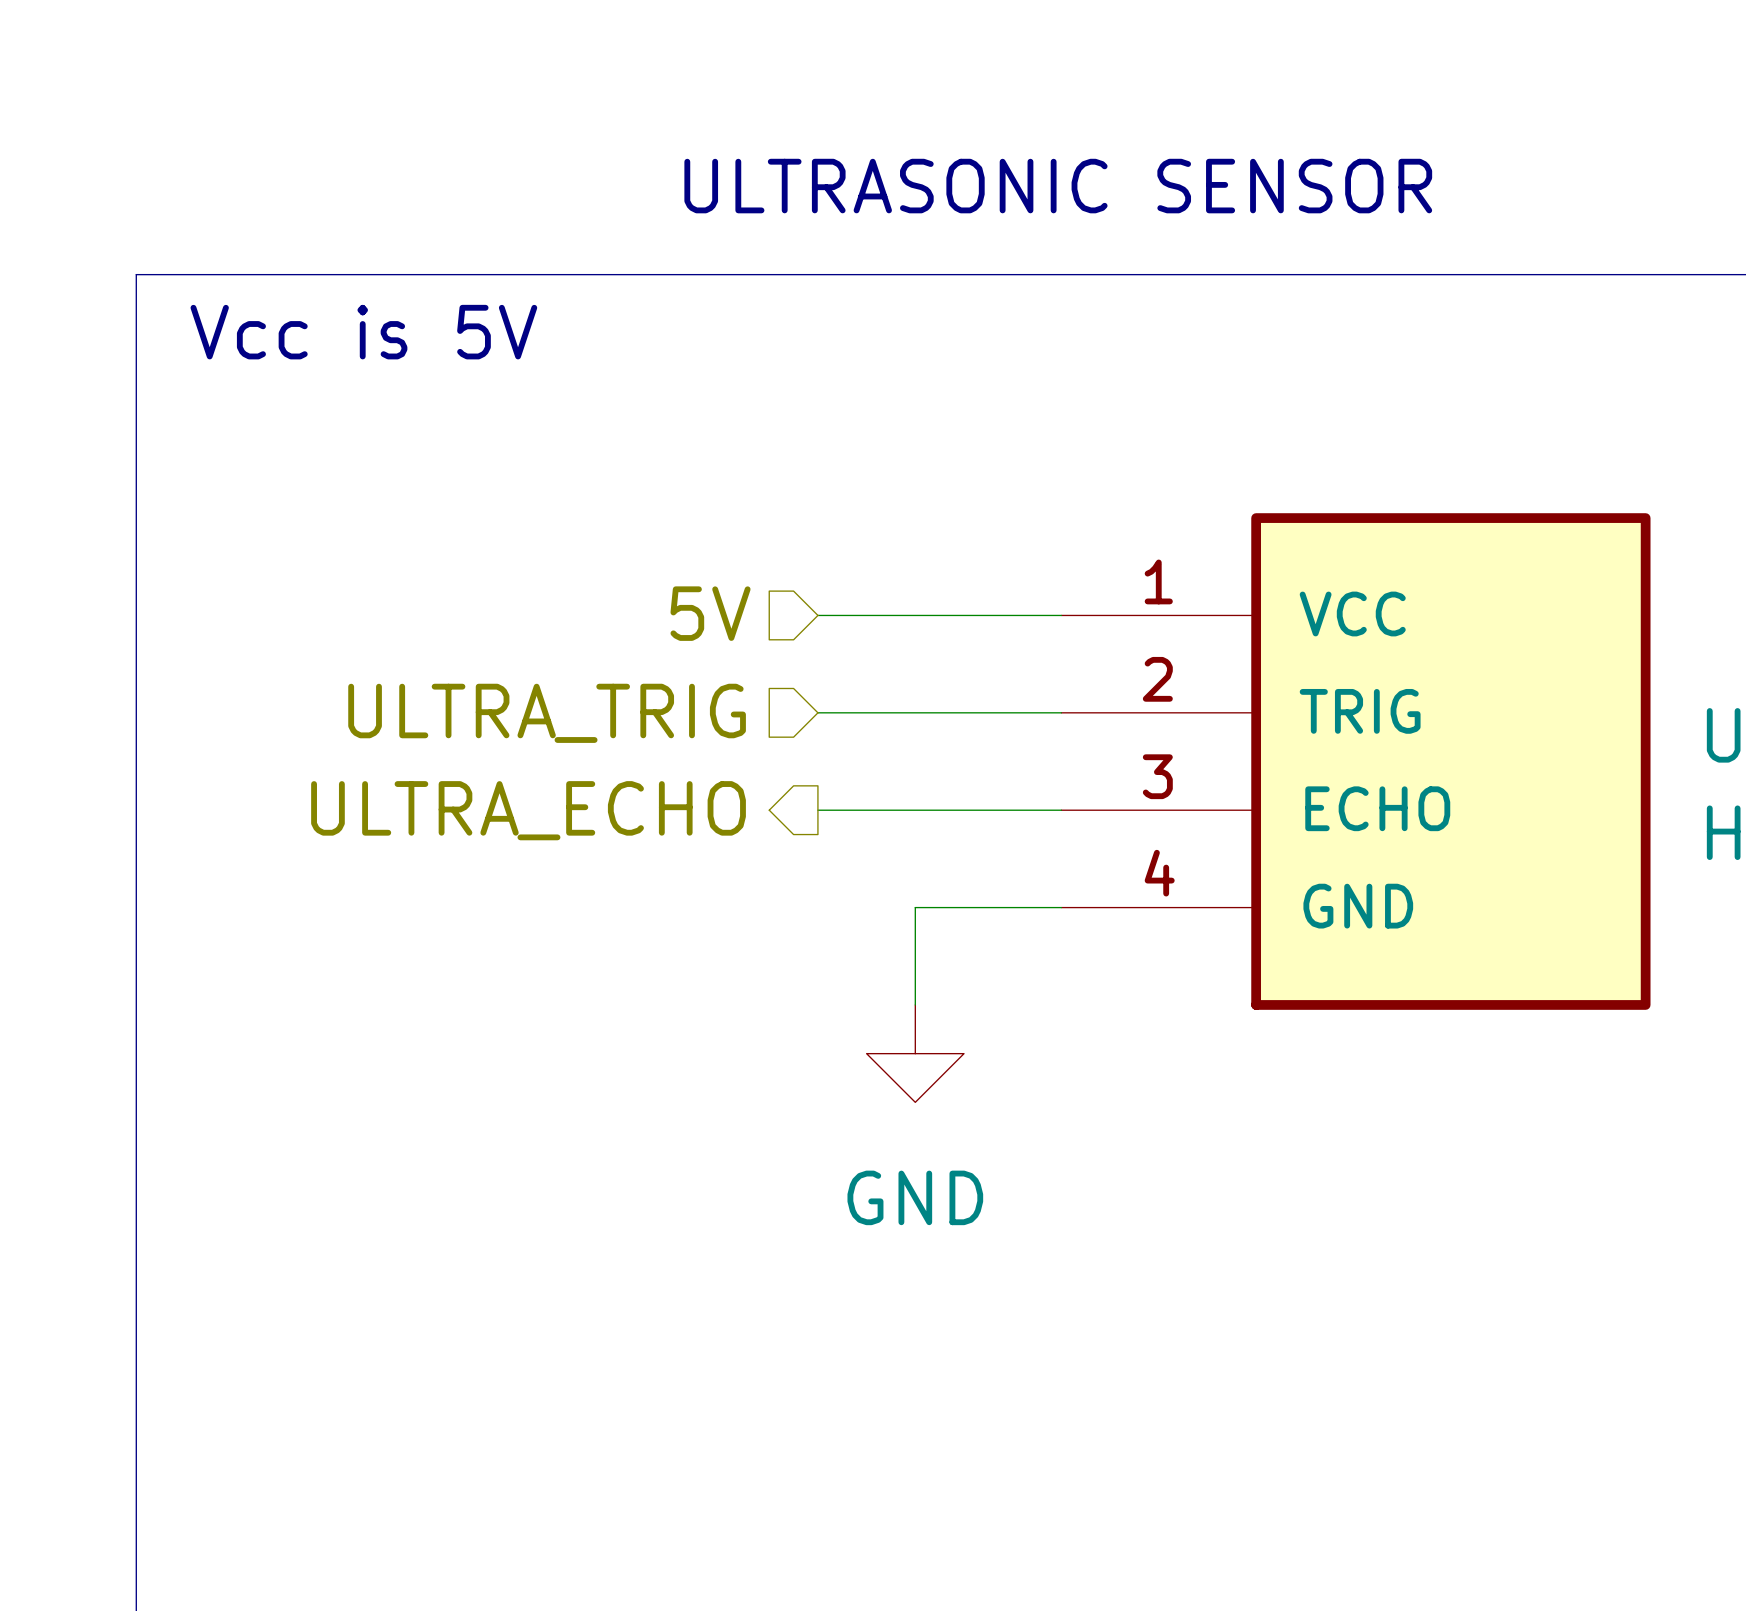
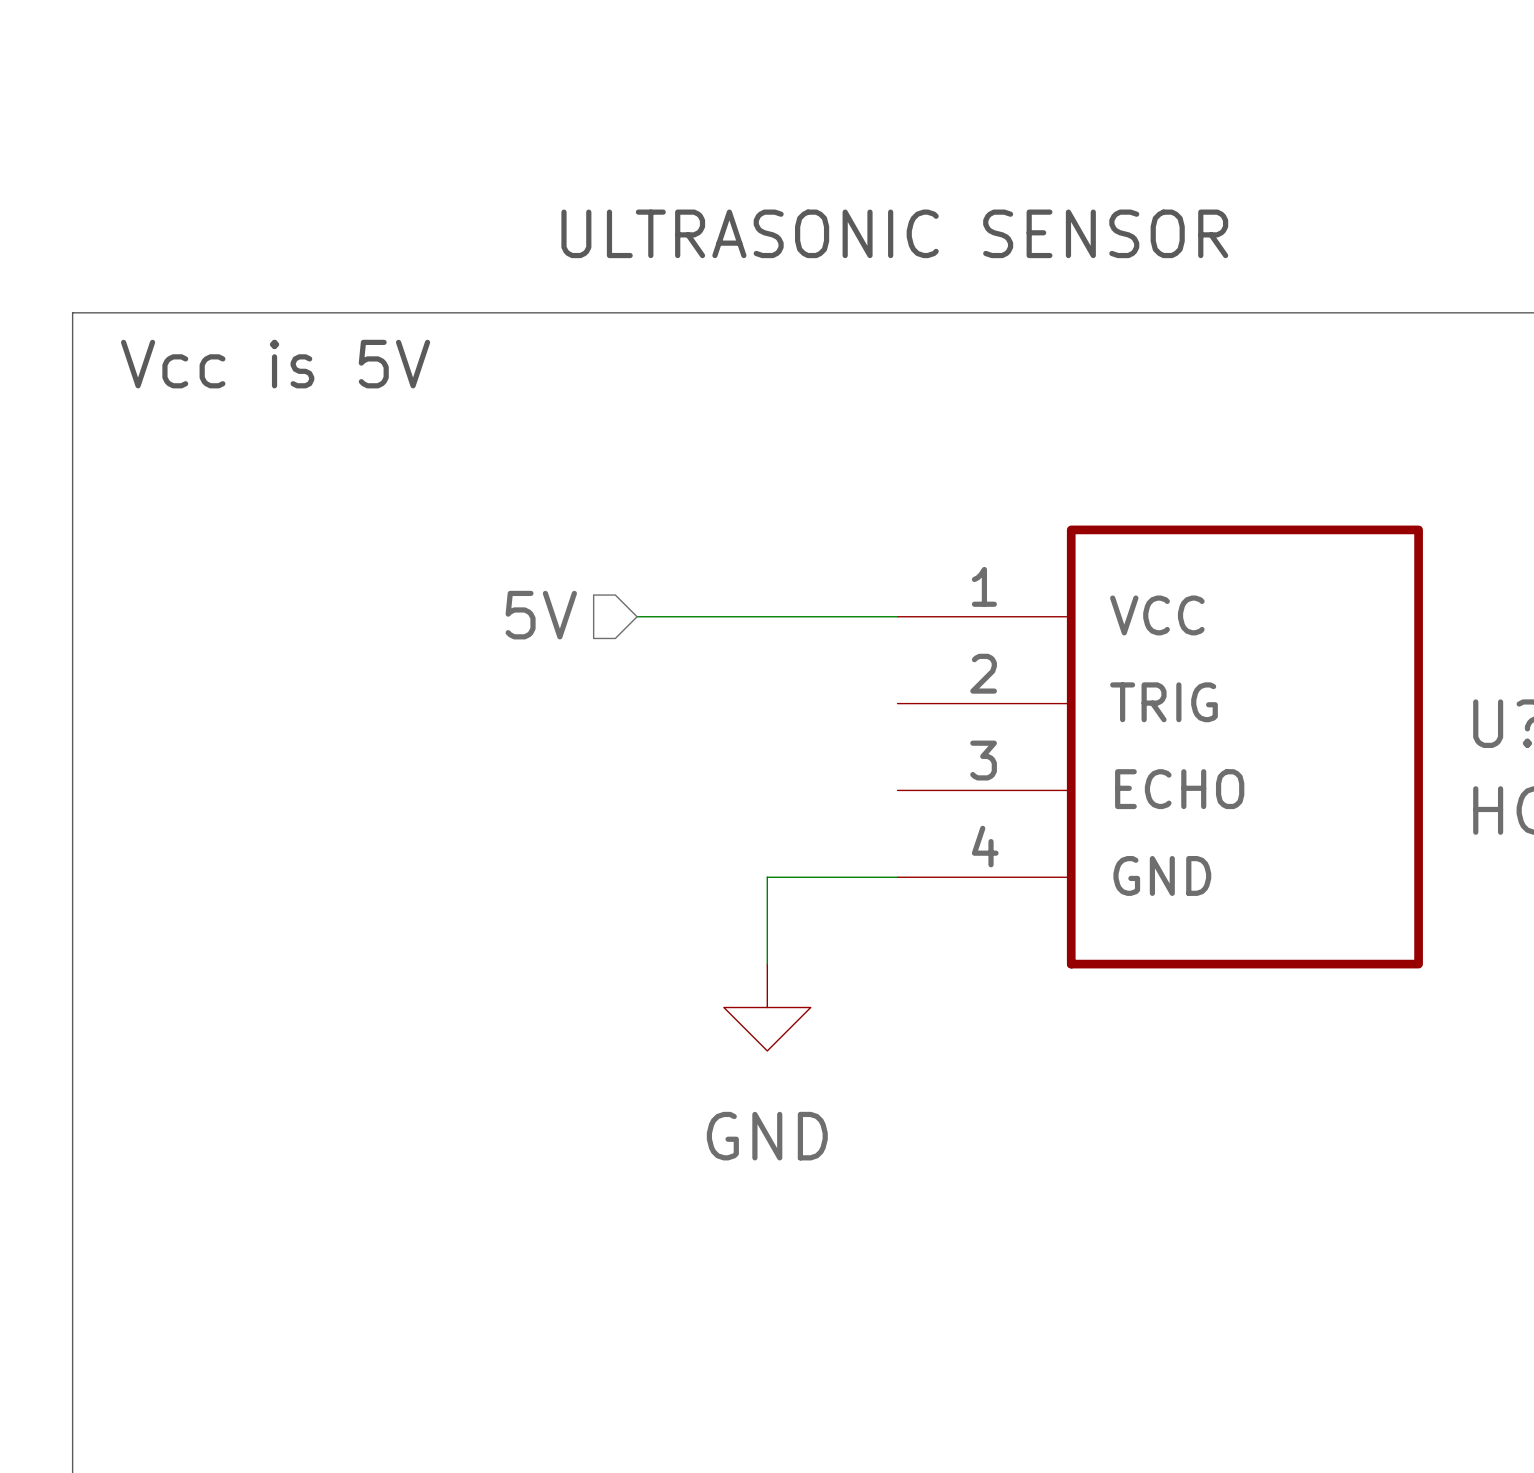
hierarchical label position: 5V (710, 613) -> 5V (541, 615)
wire: none -> (637, 616) (680, 616)
wire: (817, 712) (1061, 712) -> none
hierarchical label: ULTRA_TRIG (547, 713) -> none
hierarchical label: ULTRA_ECHO (528, 810) -> none
wire: (817, 810) (1061, 810) -> none

